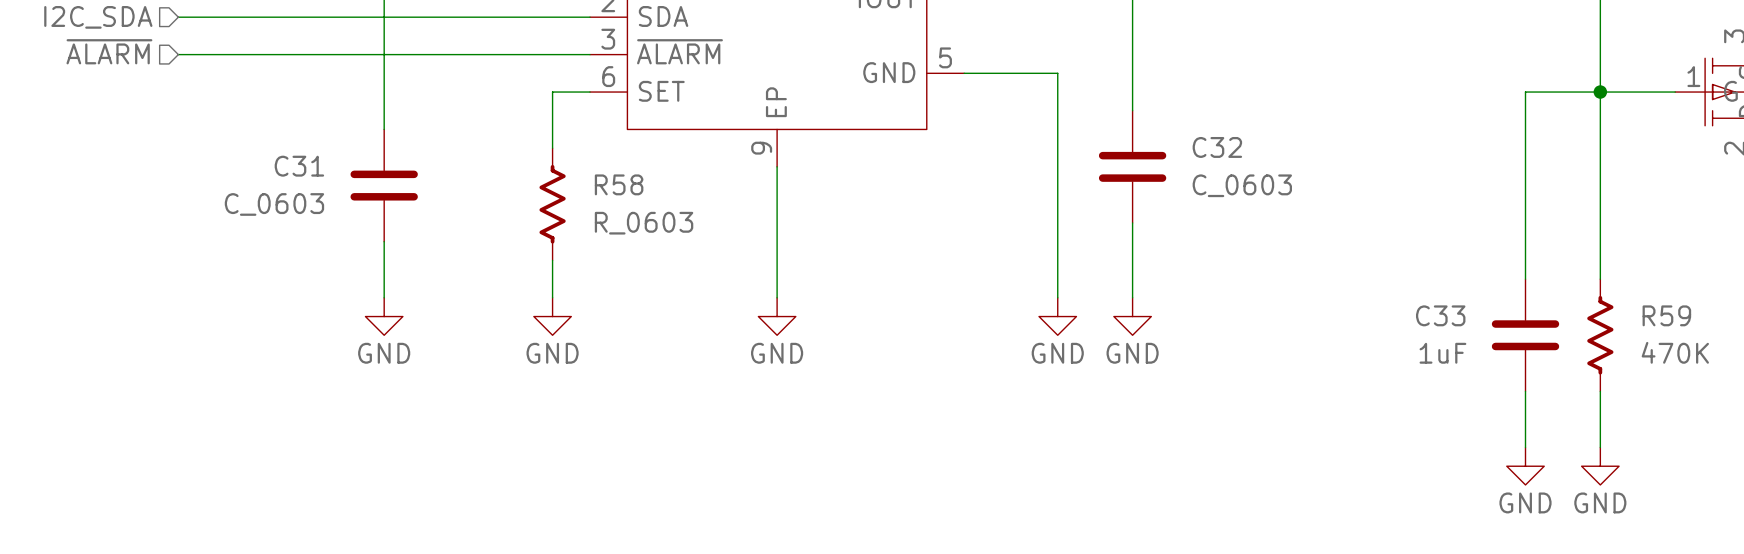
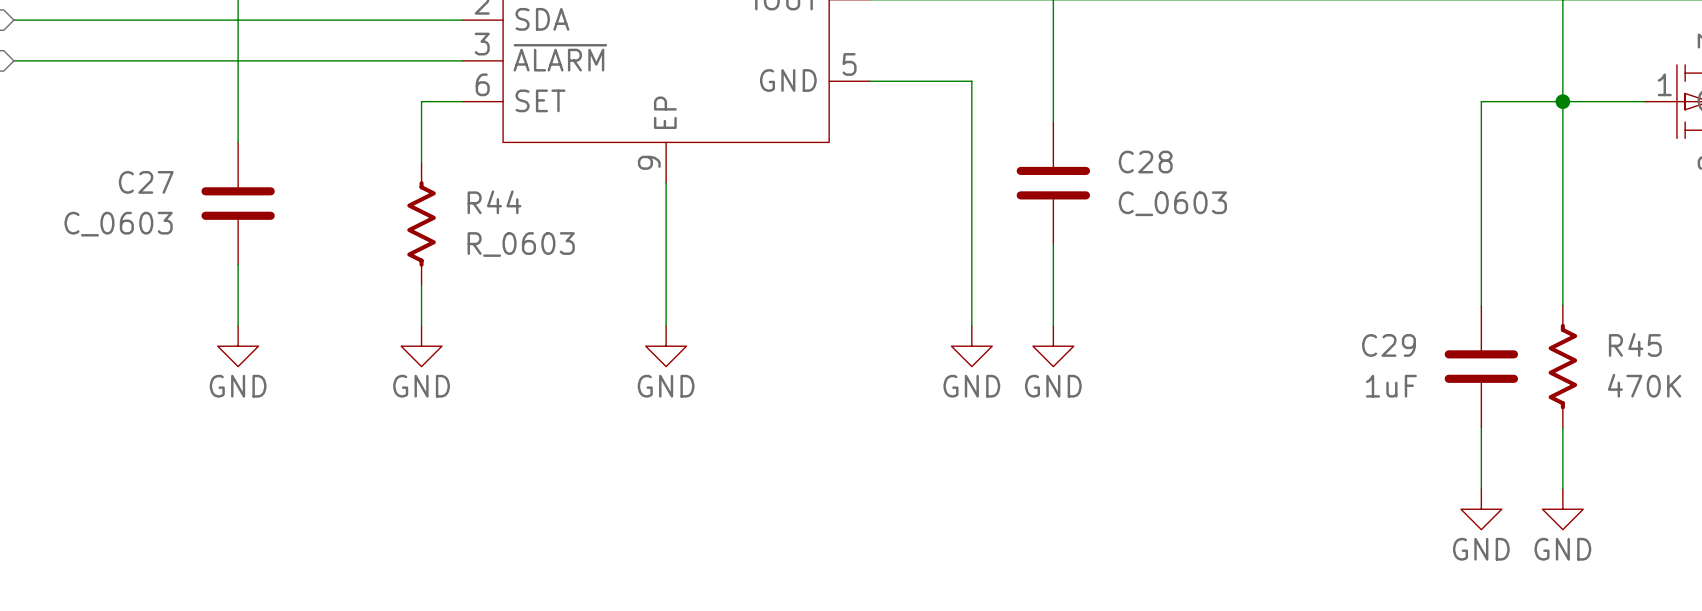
C32 name: C32 (1217, 147) -> C28 (1145, 162)
C31 name: C31 (299, 166) -> C27 (146, 182)
R58 name: R58 (619, 184) -> R44 (494, 202)
C33 name: C33 (1440, 315) -> C29 (1388, 345)
R59 name: R59 (1666, 315) -> R45 (1635, 344)

